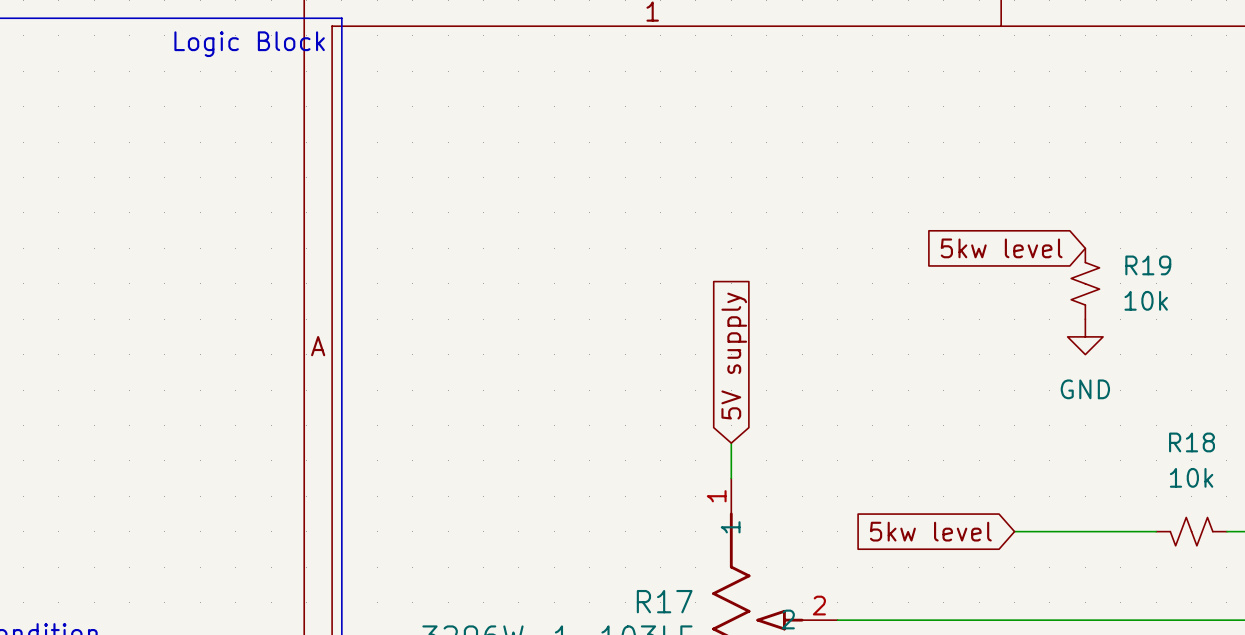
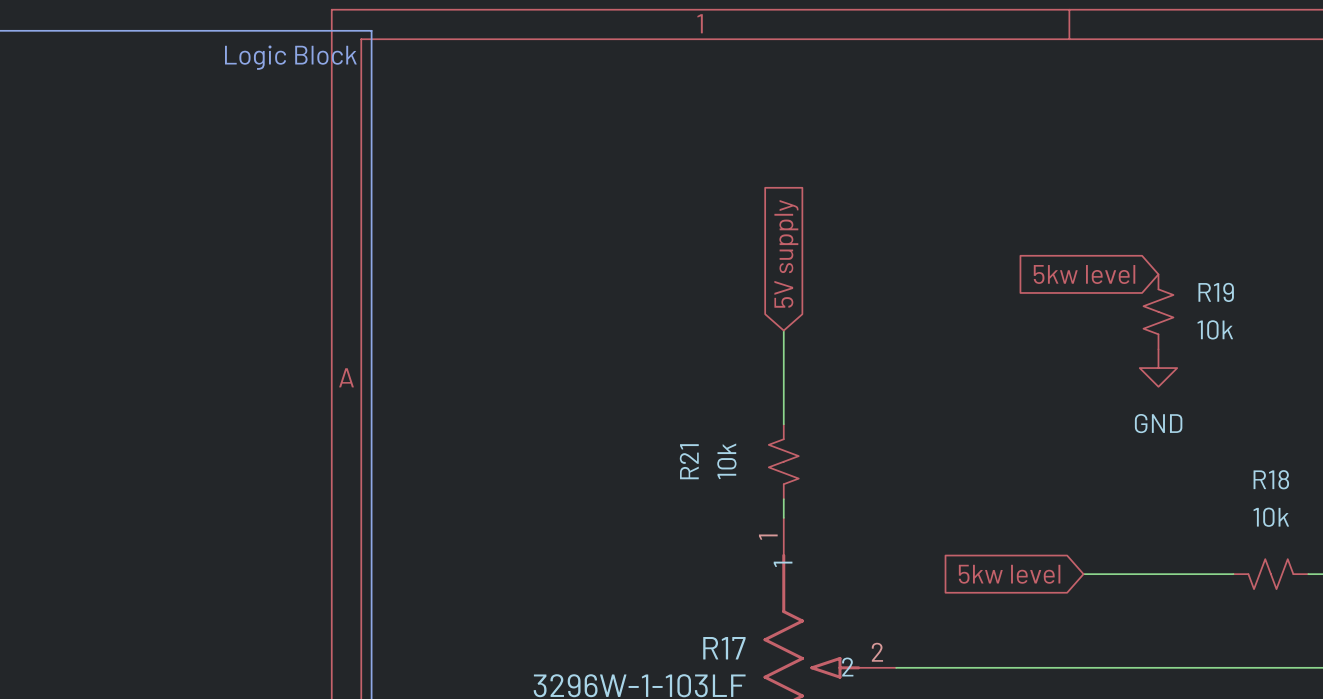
wire: none -> (783, 330) (783, 424)
global label position: 5V supply (734, 356) -> 5V supply (786, 253)
R21: none -> 10k (783, 461)

